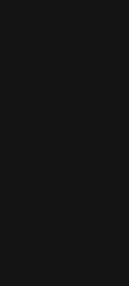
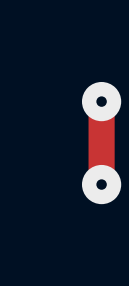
track: none -> (101, 101) (101, 184)
via: none -> (101, 101)
via: none -> (101, 184)

